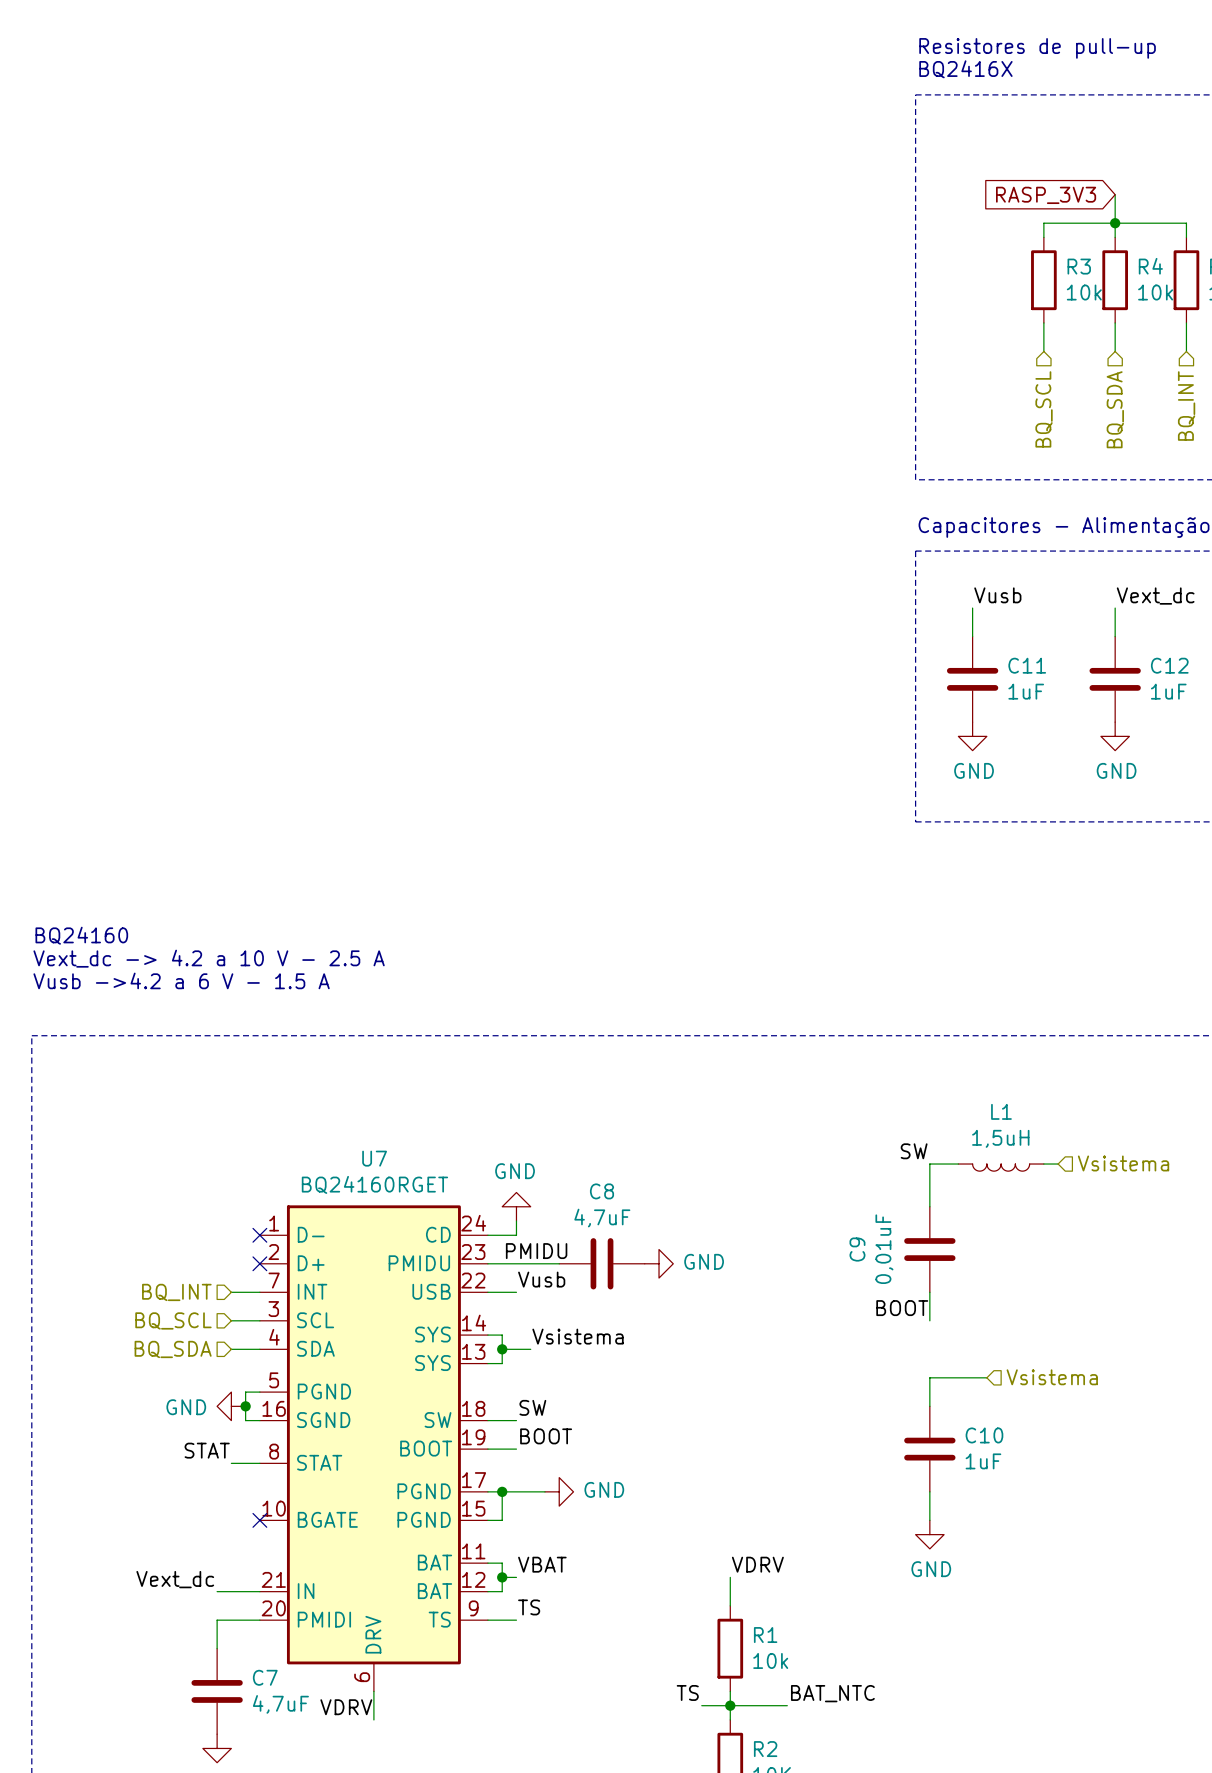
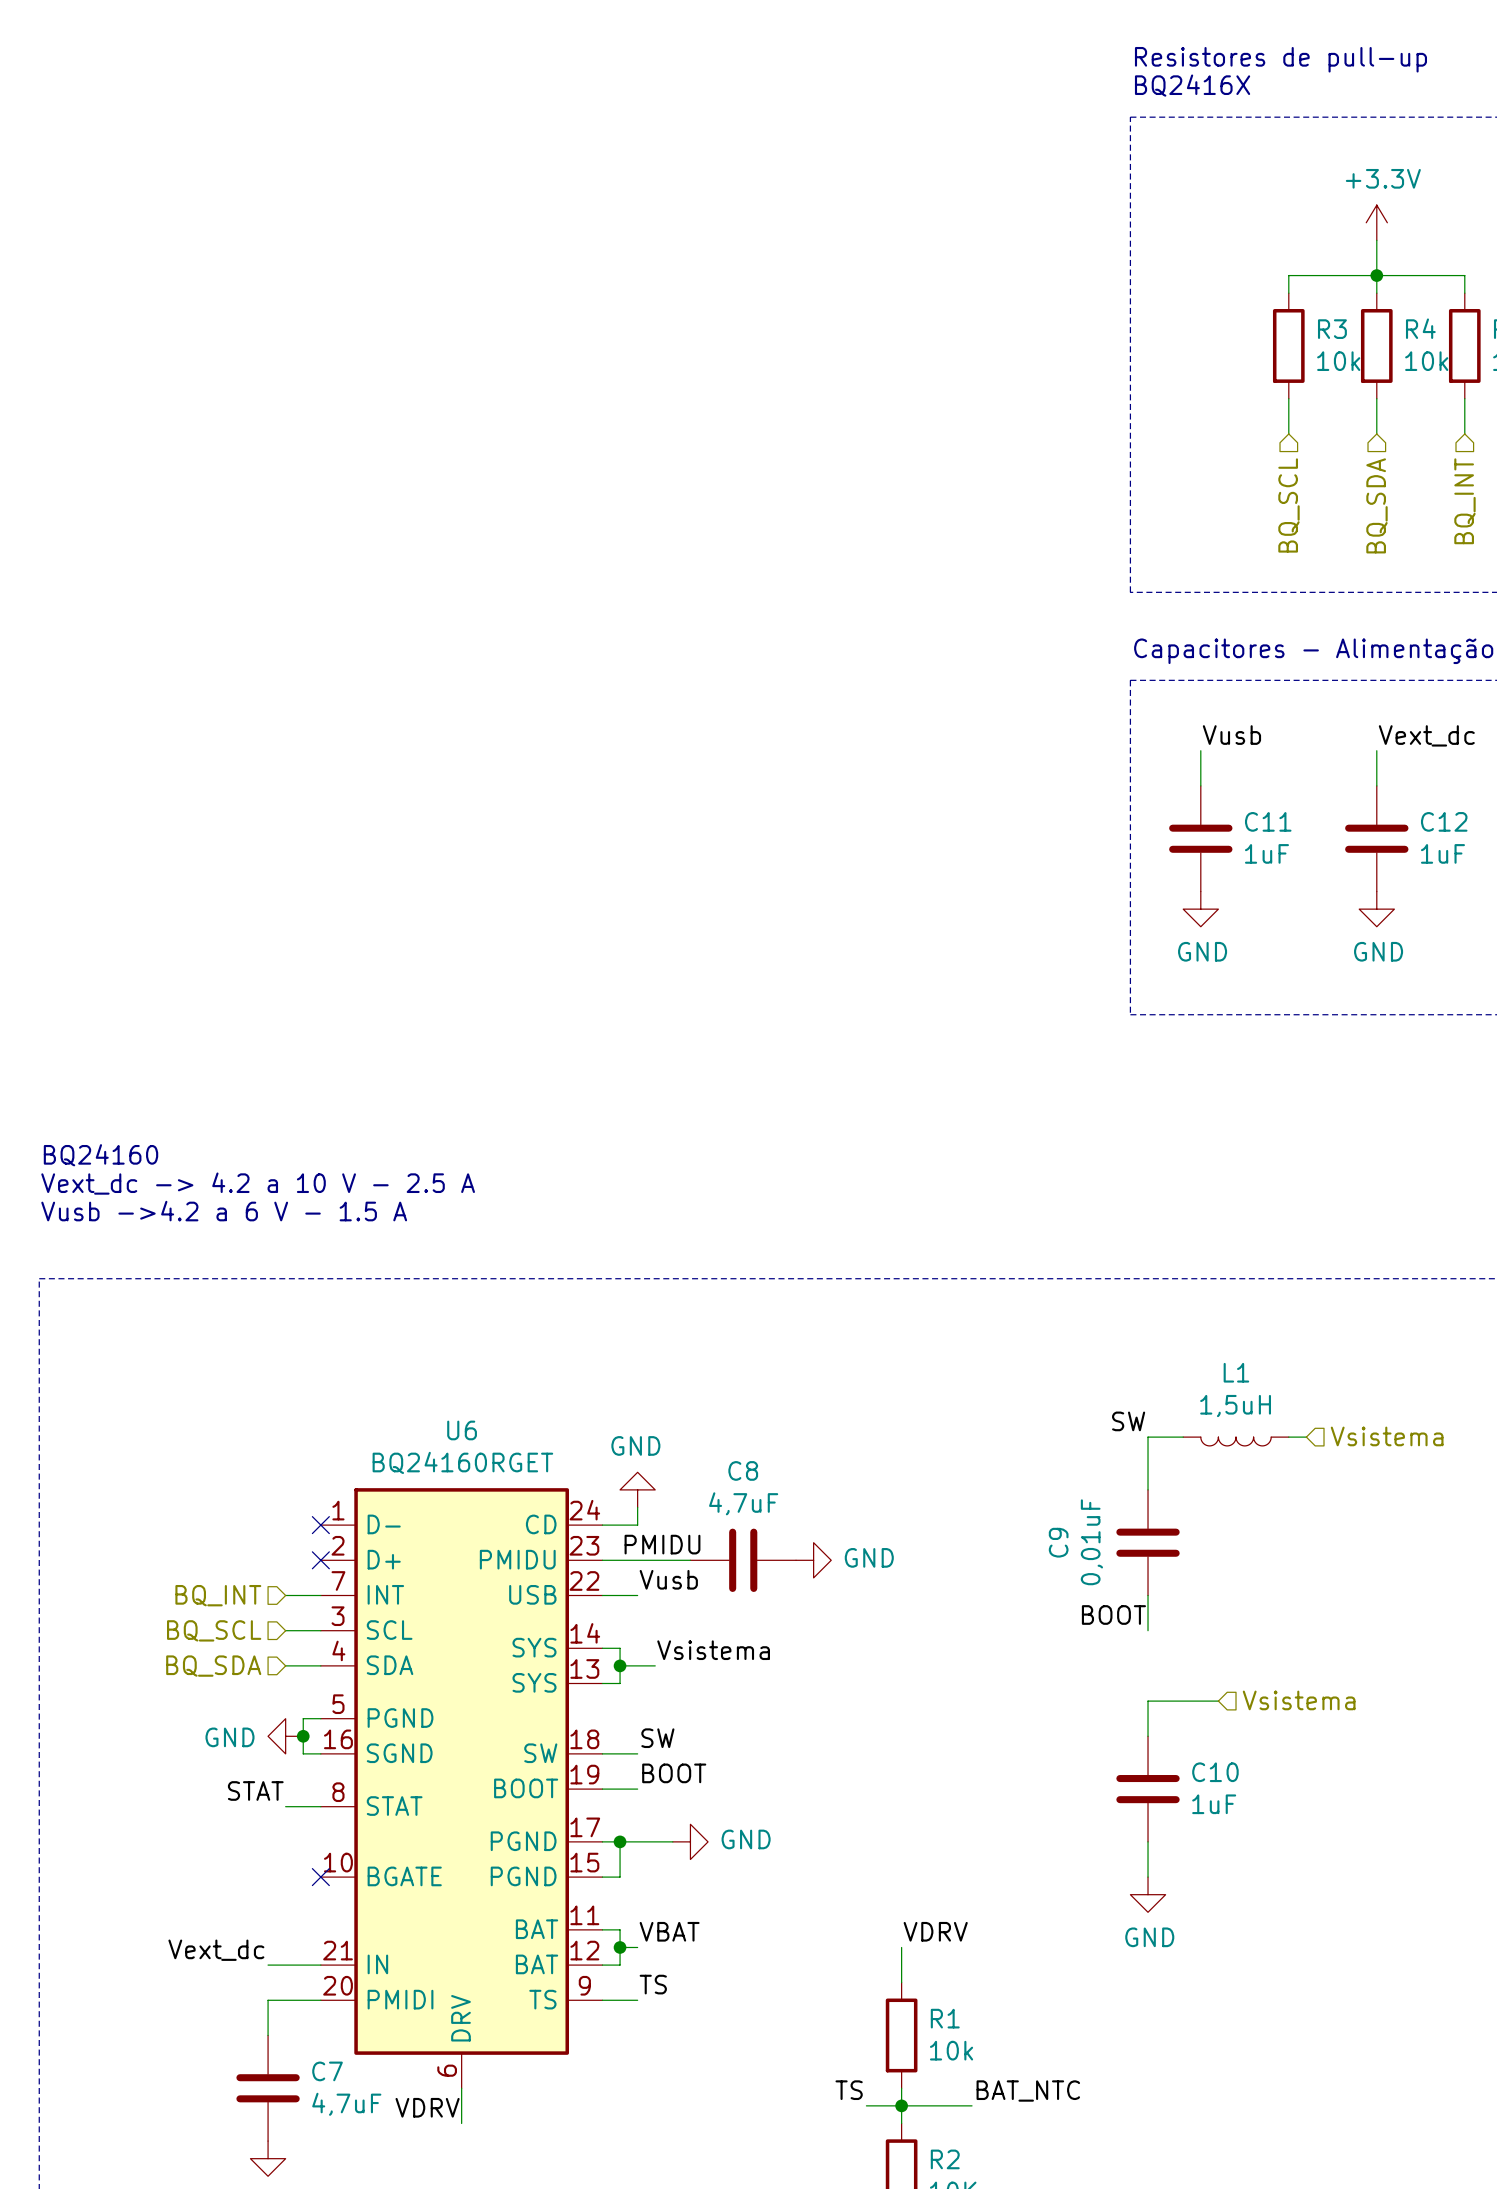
power symbol: none -> +3.3V (1376, 222)
global label: RASP_3V3 (1046, 195) -> none
U7 name: U7 (374, 1158) -> U6 (462, 1430)

